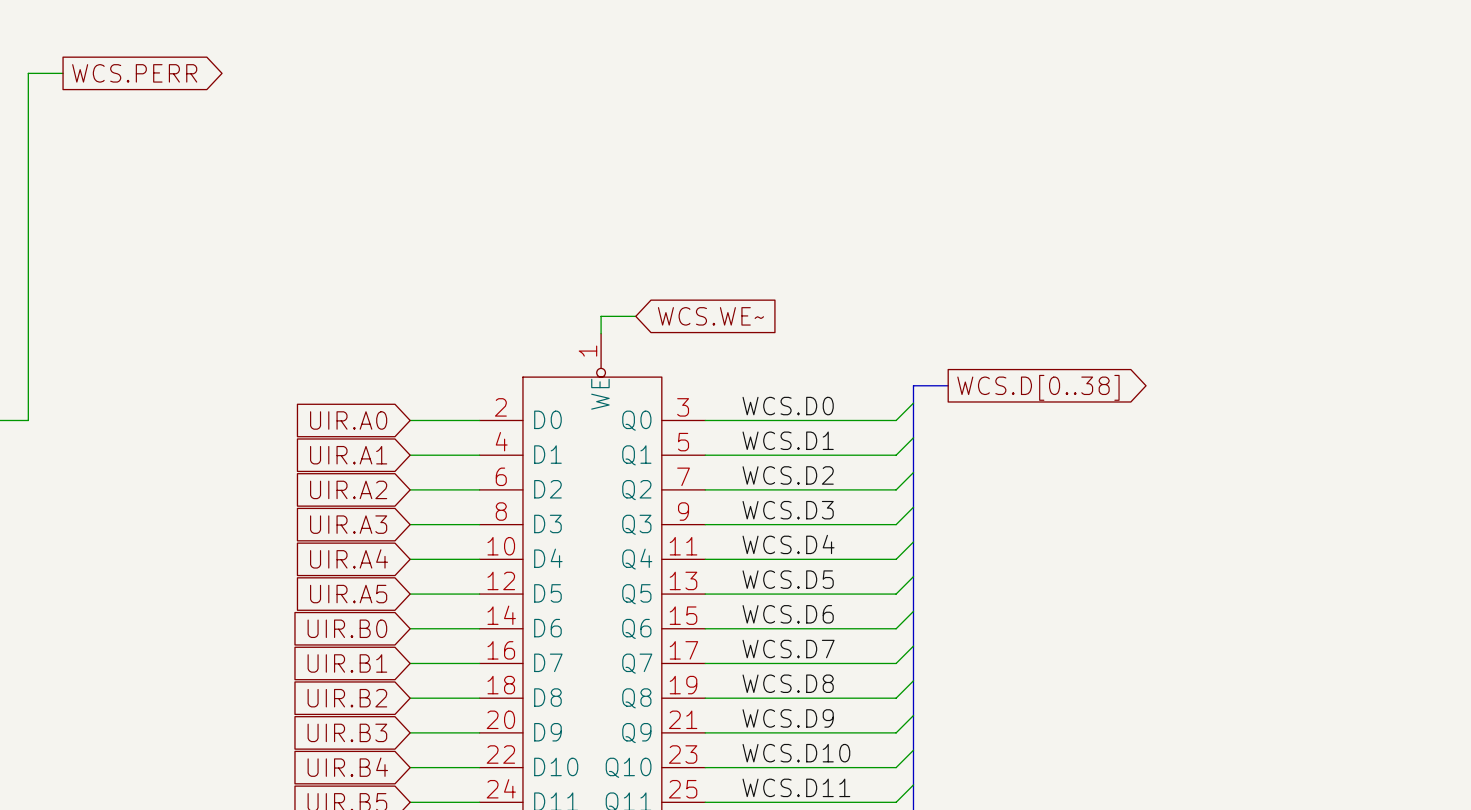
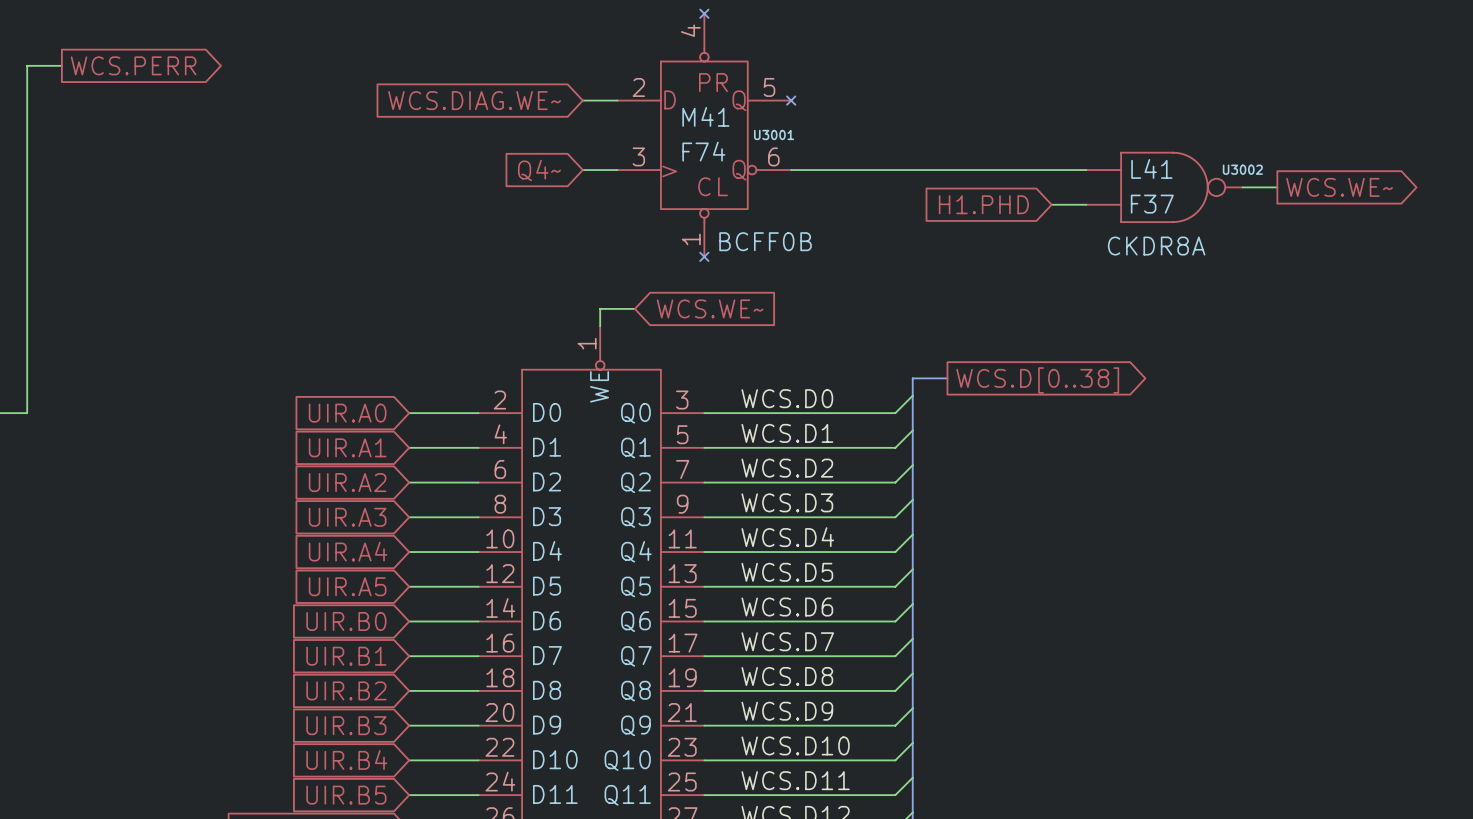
no-connect mark: none -> (704, 13)
global label: none -> WCS.DIAG.WE~ (474, 100)
wire: none -> (582, 100) (617, 100)
no-connect mark: none -> (791, 100)
U3001: none -> F74 (704, 135)
global label: none -> Q4~ (539, 170)
wire: none -> (582, 170) (617, 170)
wire: none -> (791, 170) (1086, 170)
U3002: none -> F37 (1164, 187)
wire: none -> (1242, 187) (1277, 187)
global label: none -> WCS.WE~ (1339, 187)
global label: none -> H1.PHD (983, 204)
wire: none -> (1051, 204) (1086, 204)
no-connect mark: none -> (704, 256)

